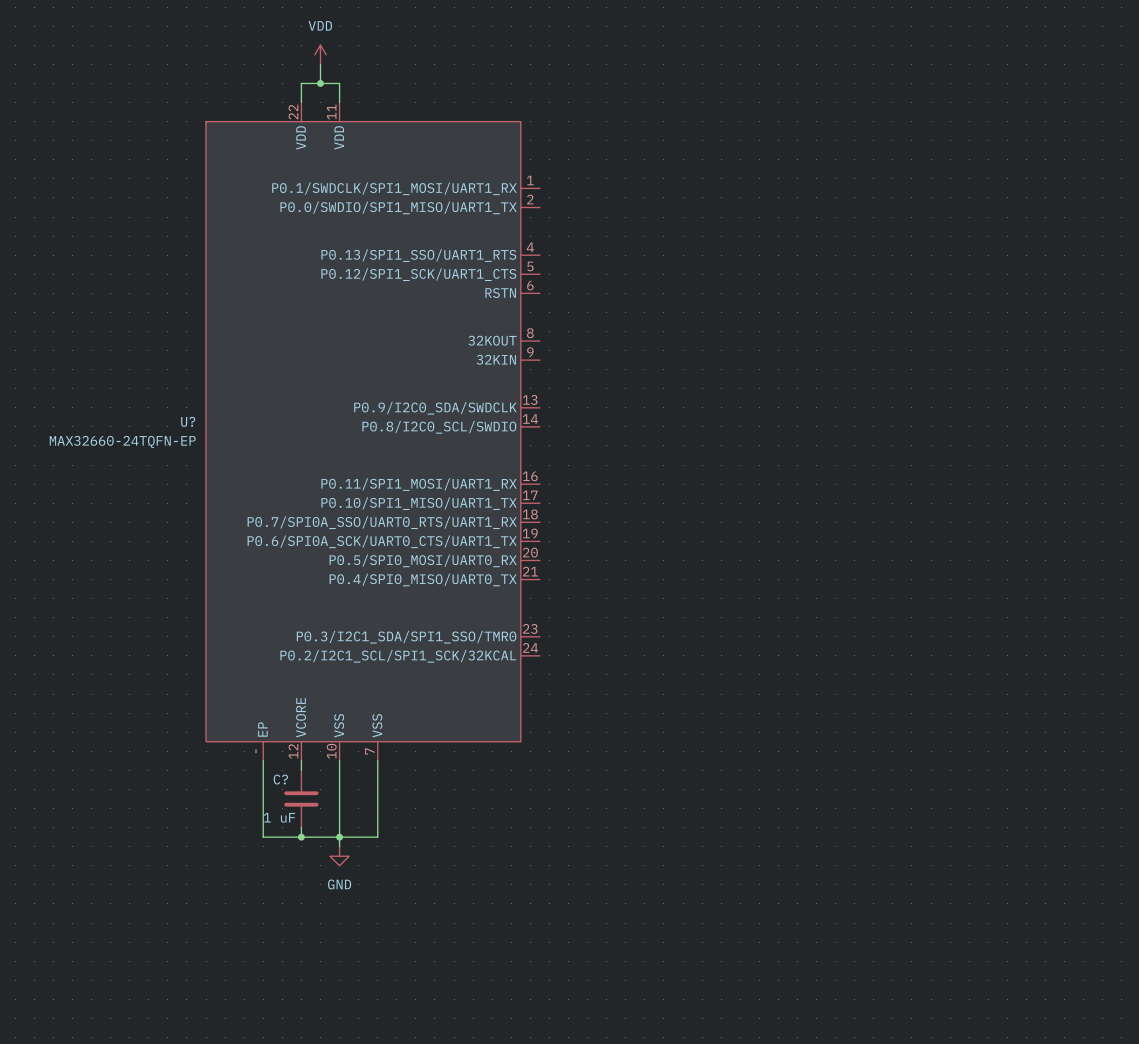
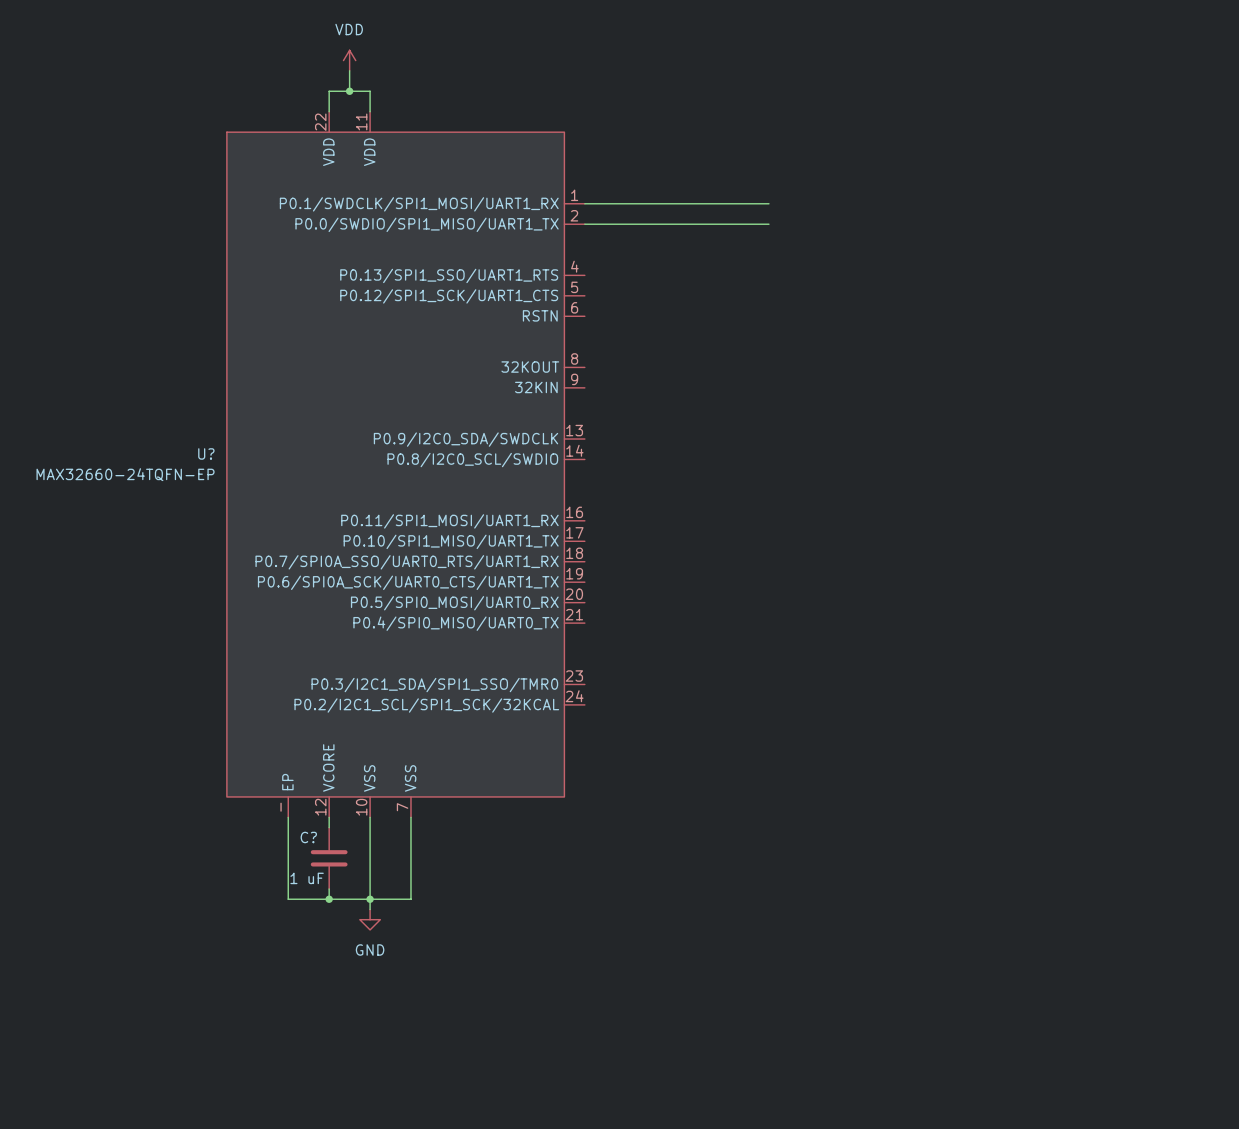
wire: none -> (584, 203) (768, 203)
wire: none -> (584, 224) (768, 224)

